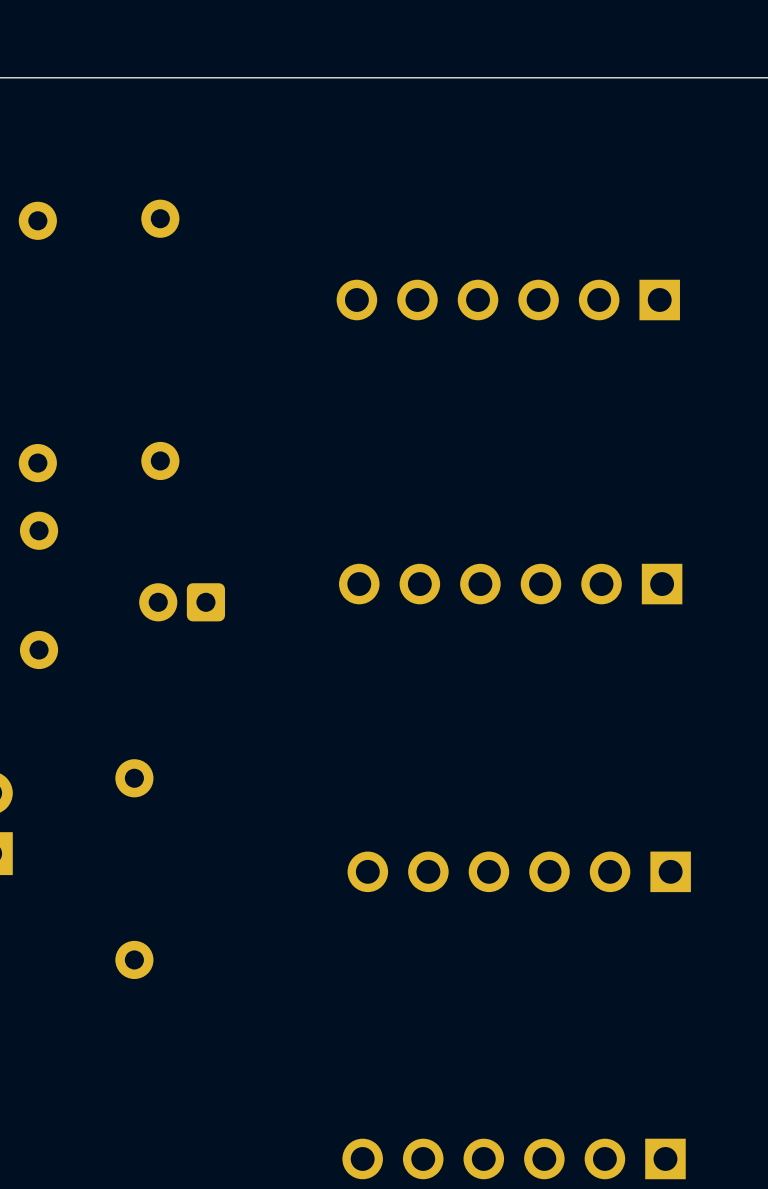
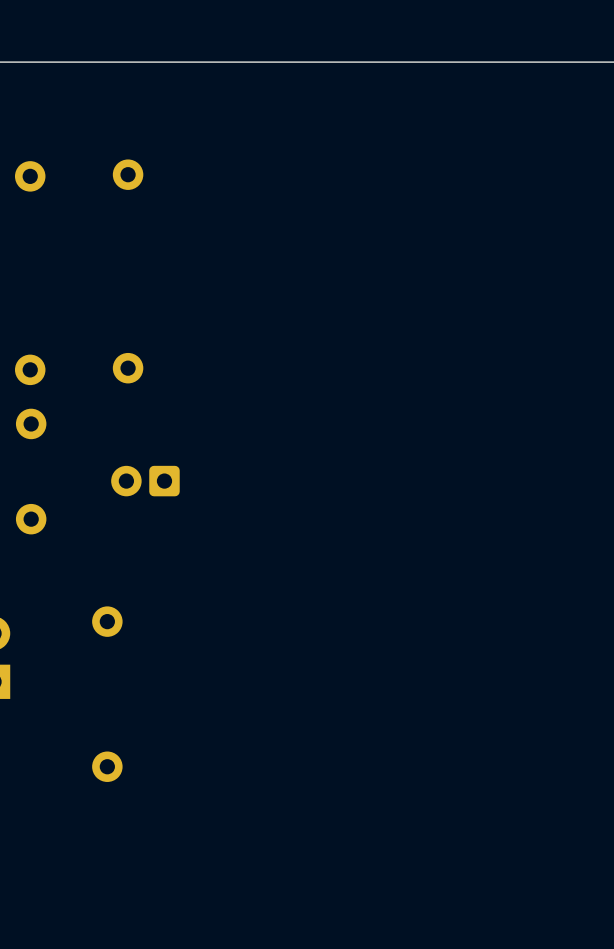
part: (508, 300) -> none
part: (510, 584) -> none
part: (519, 871) -> none
part: (514, 1158) -> none

